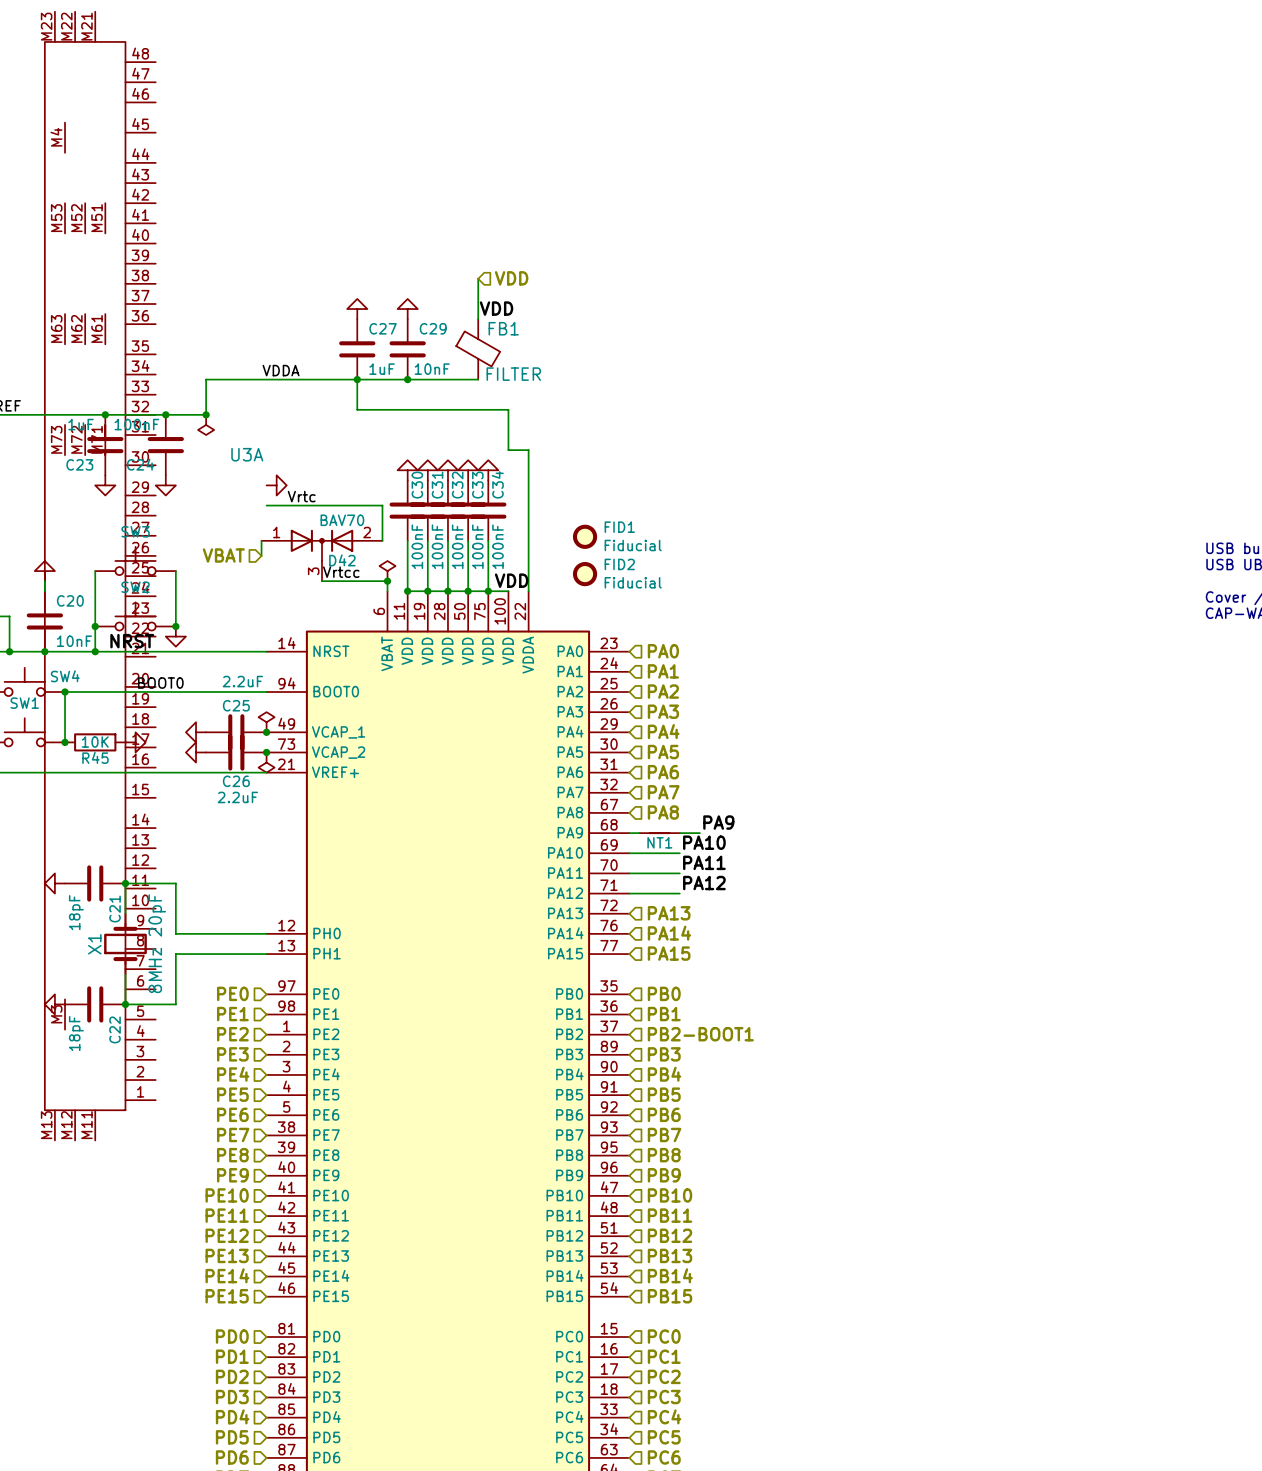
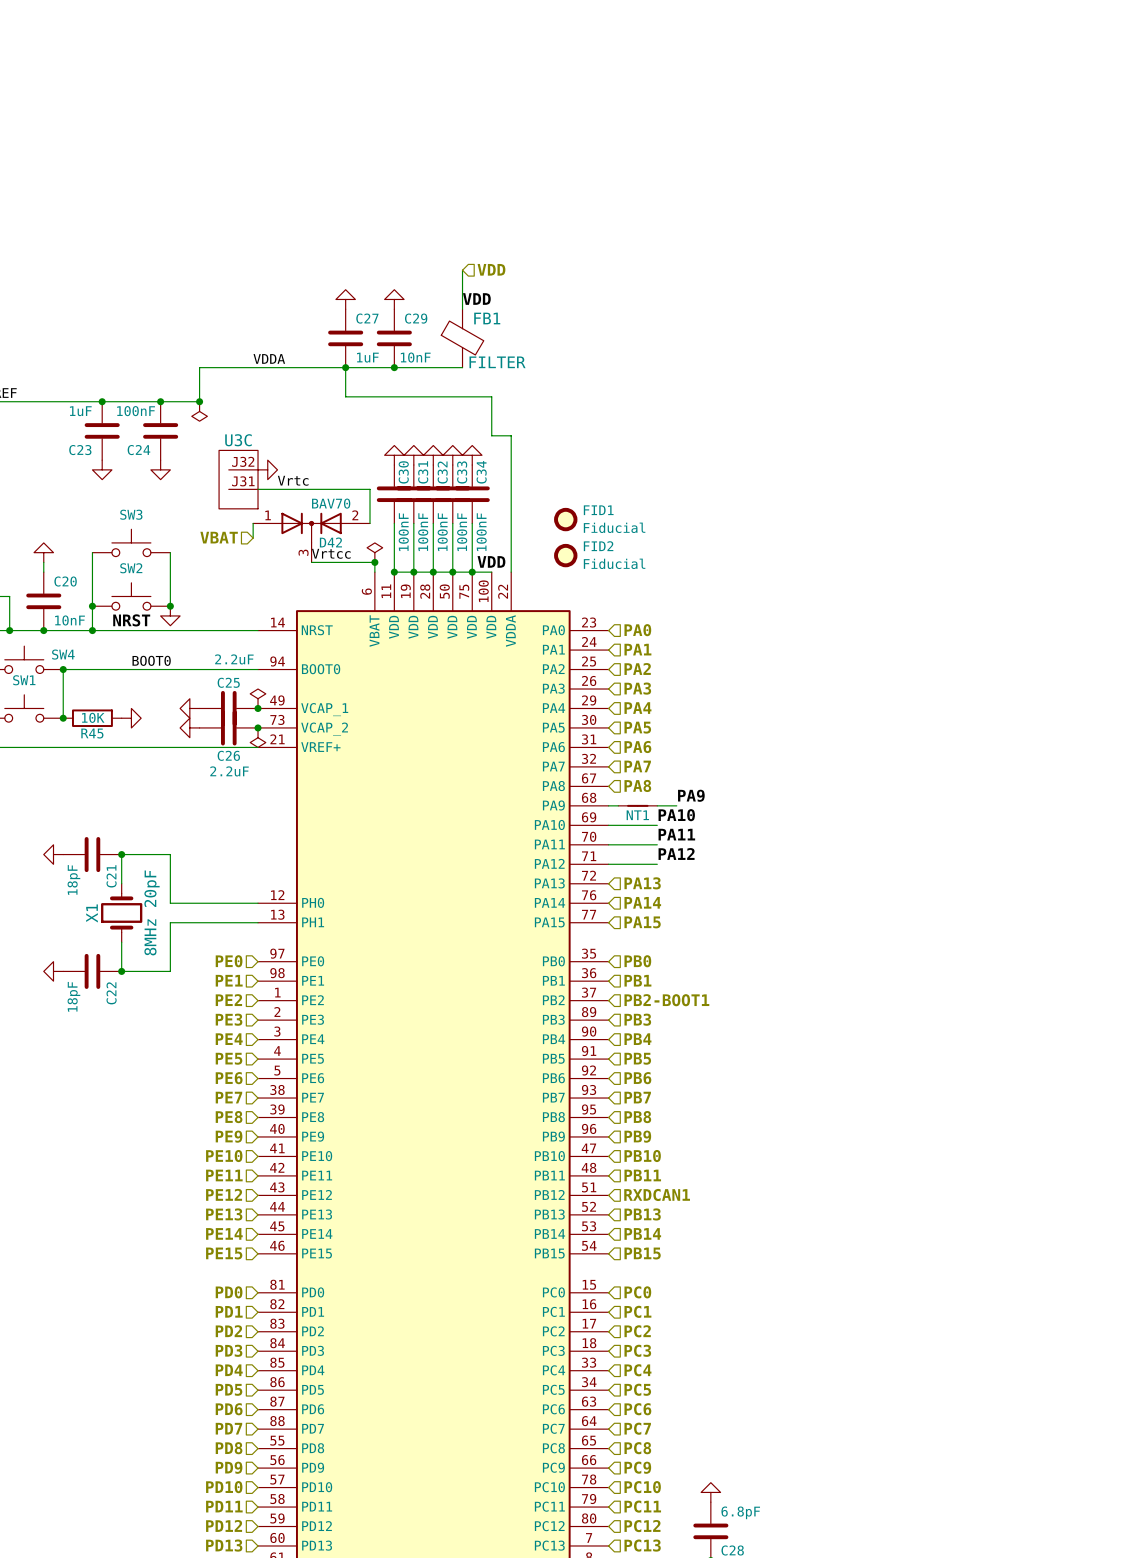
U3C: none -> (238, 479)
U3A: (100, 576) -> none
hierarchical label: PB12 (670, 1235) -> RXDCAN1 (657, 1194)

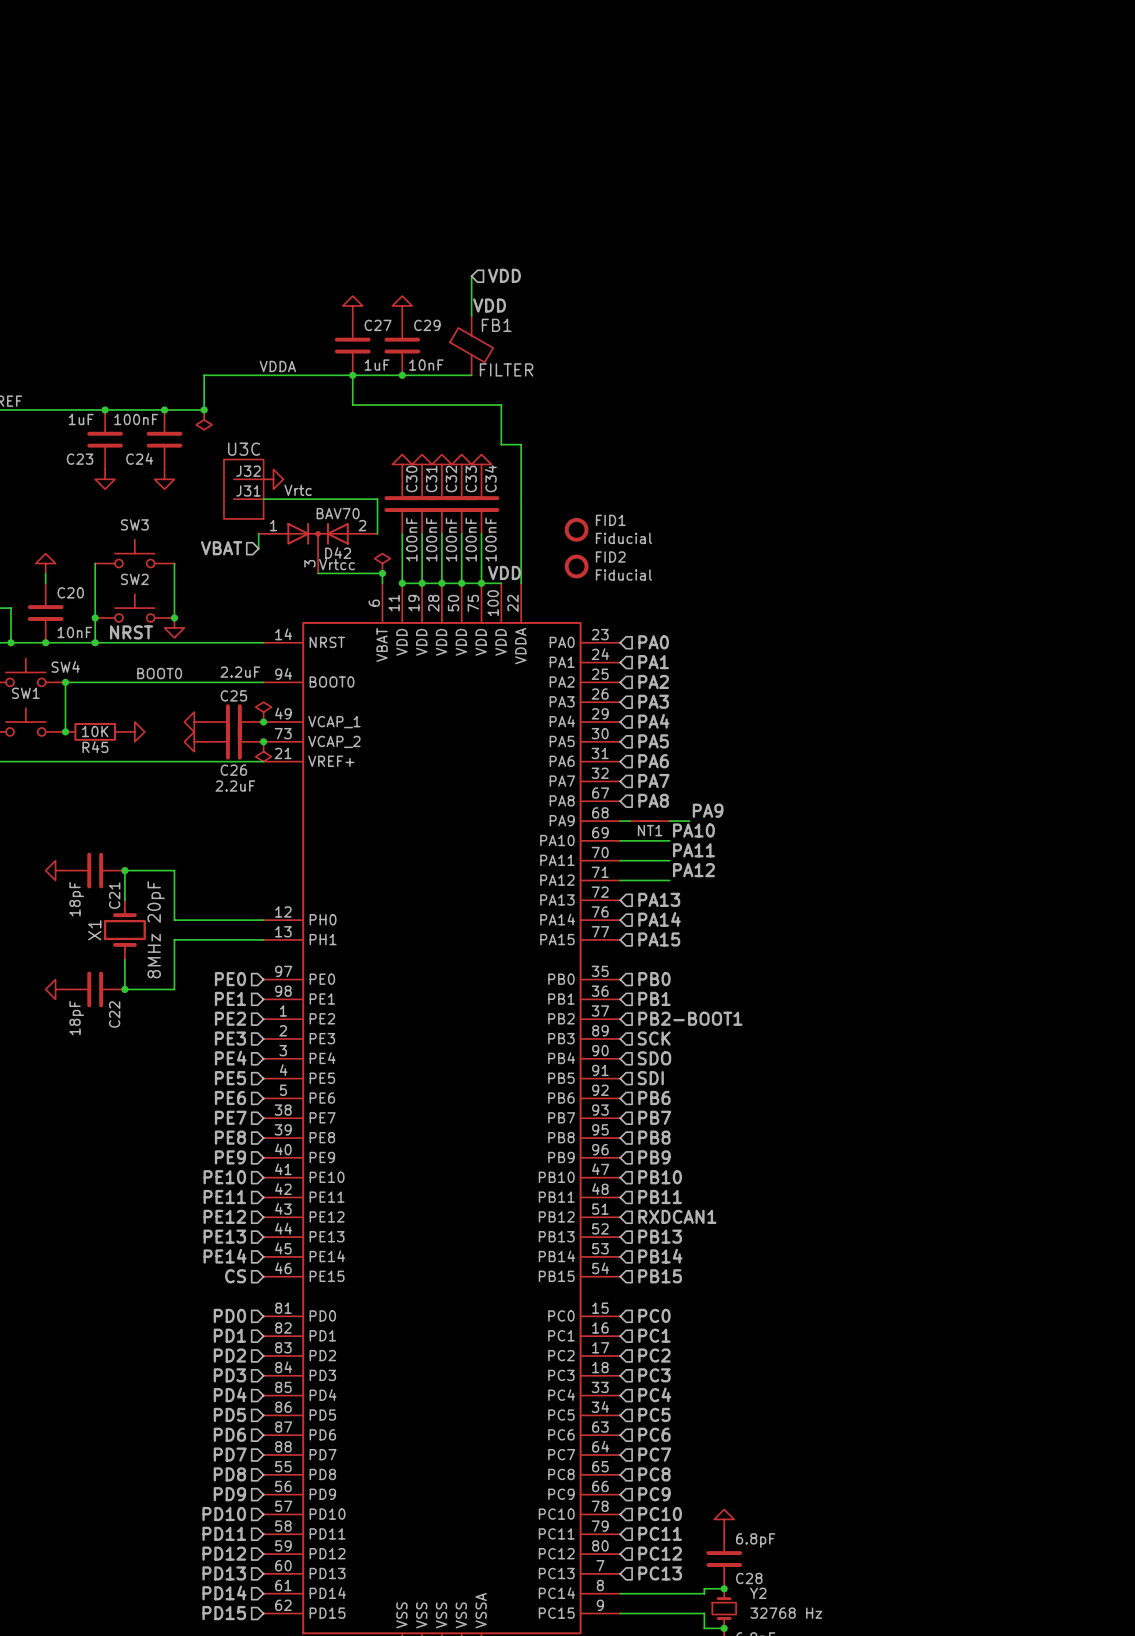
hierarchical label: PB3 (637, 1019) -> SCK (654, 1038)
hierarchical label: PB4 (637, 1039) -> SDO (654, 1058)
hierarchical label: PB5 (637, 1058) -> SDI (650, 1078)
hierarchical label: PE15 (224, 1253) -> CS (235, 1276)

